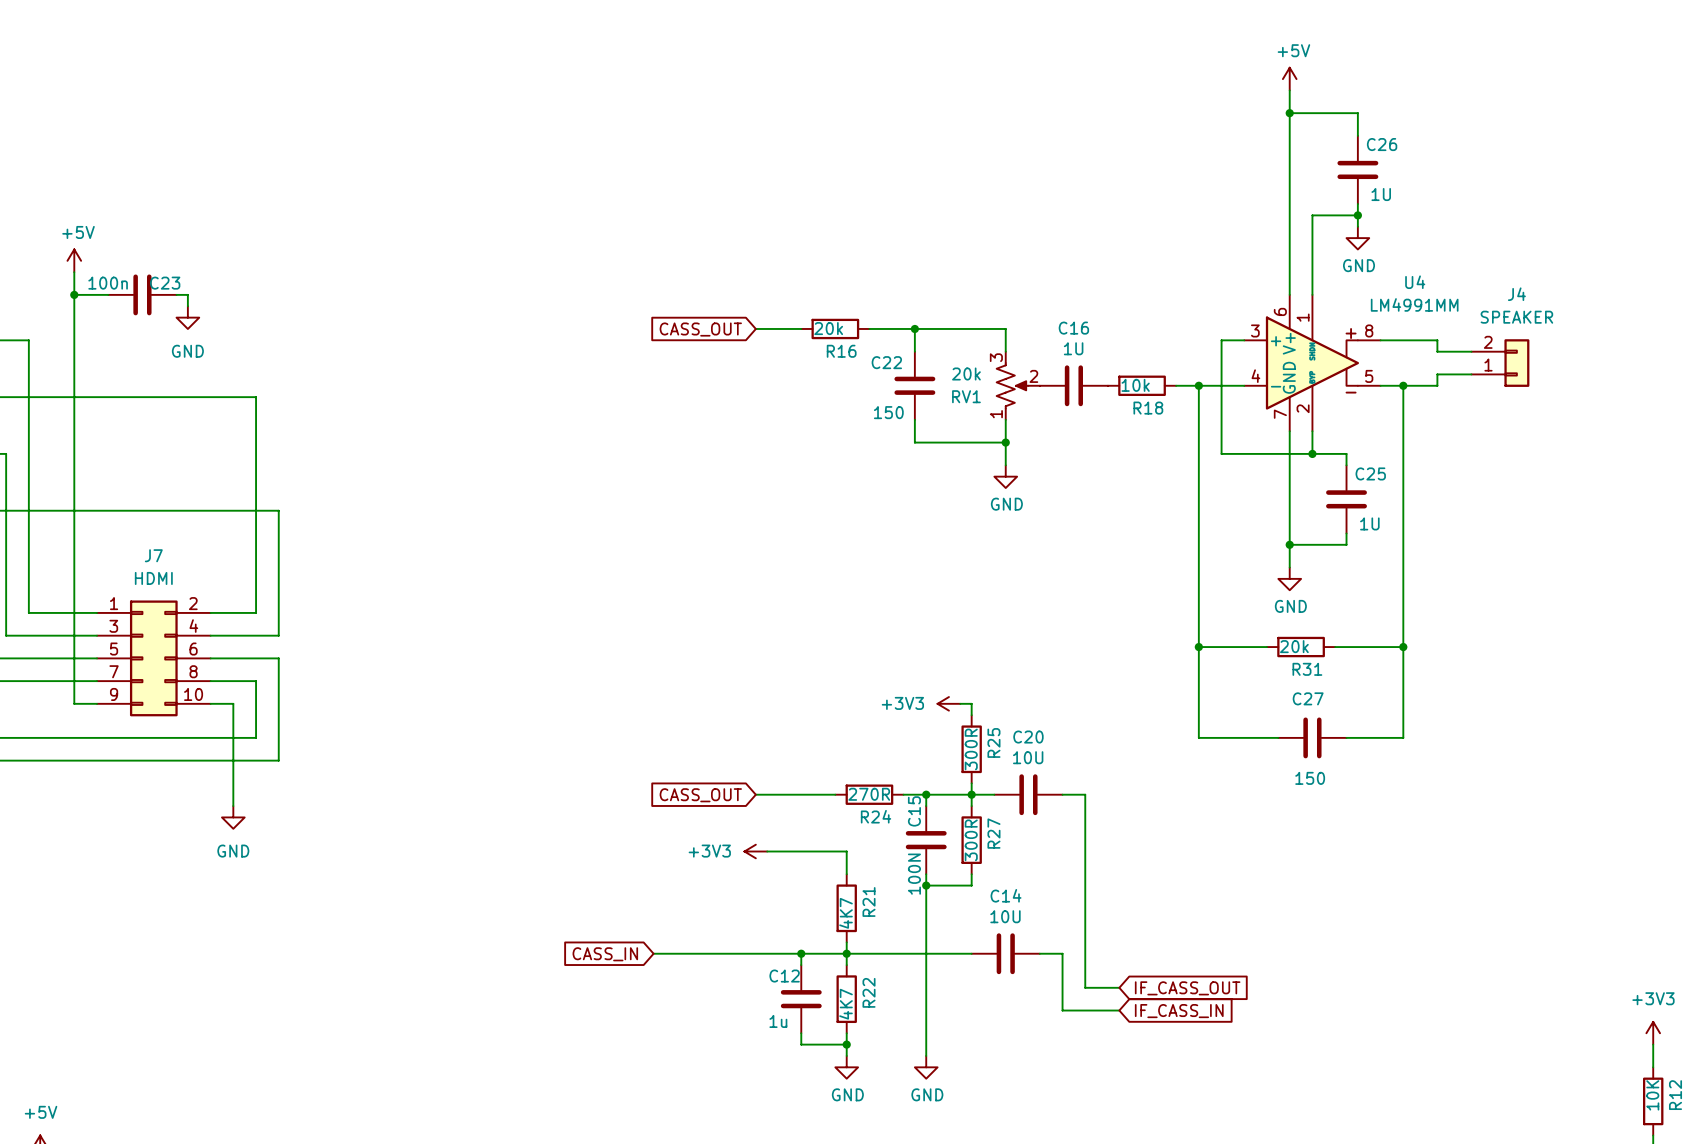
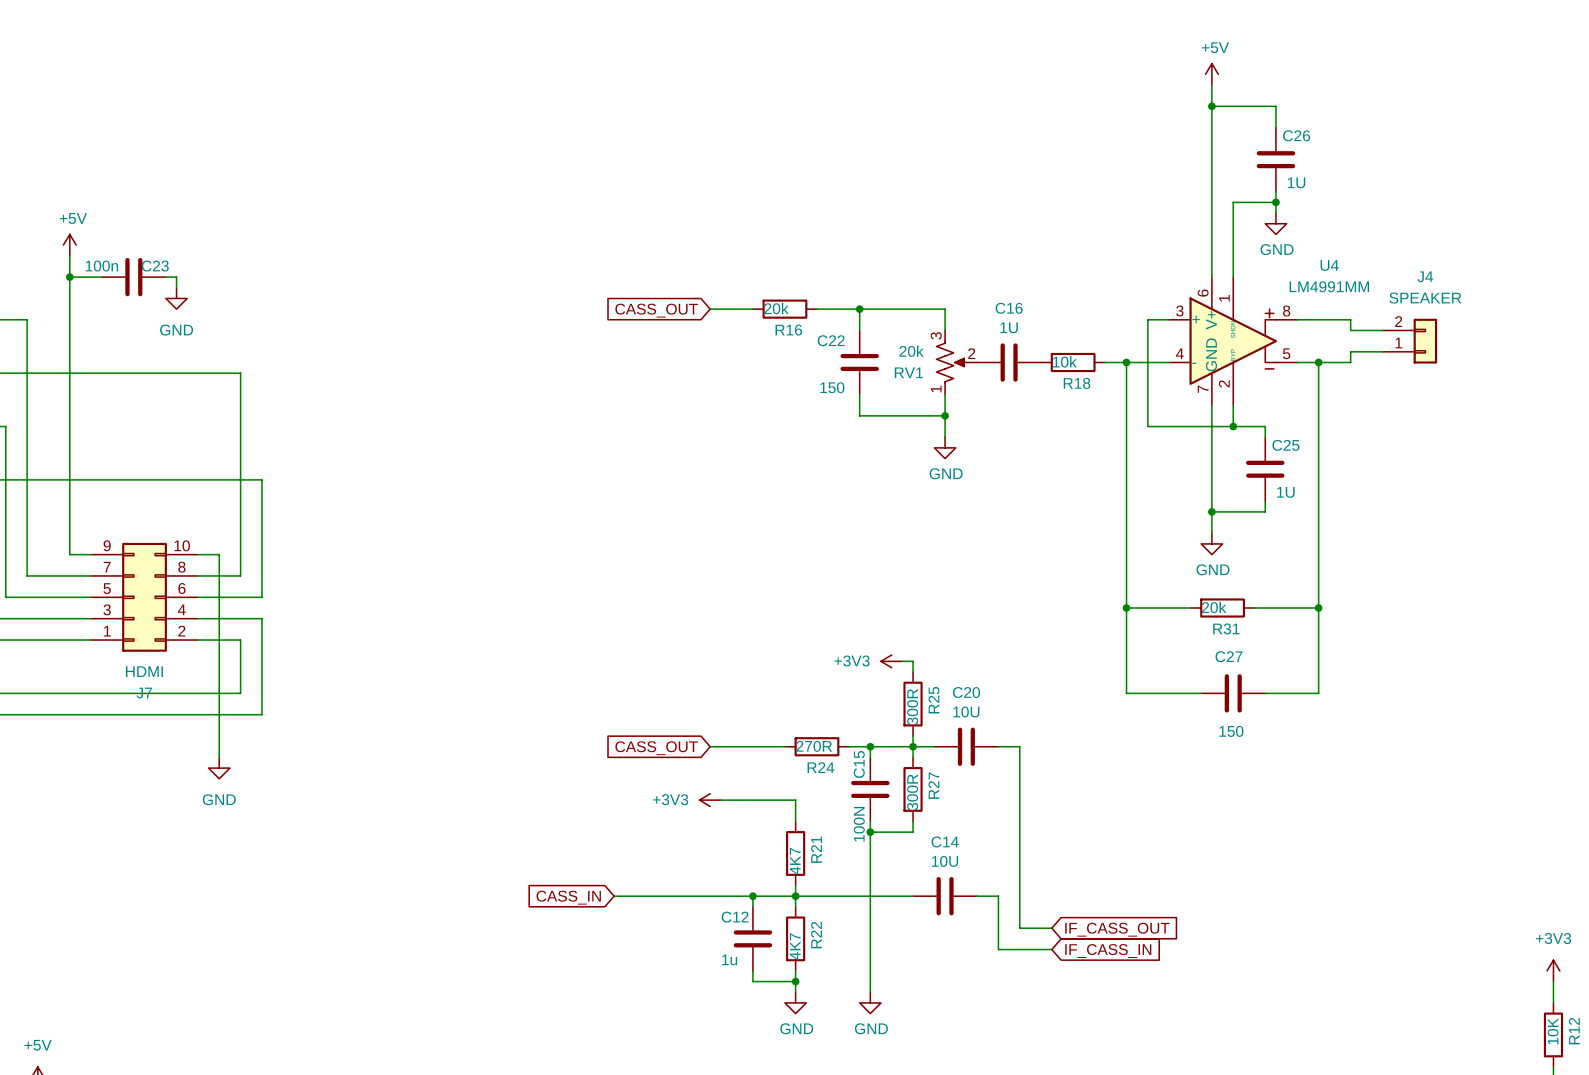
wire: (74, 590) (74, 703) (97, 703) -> (69, 554) (91, 554)
J7 flip: as is (153, 658) -> up-down (144, 597)
wire: (210, 703) (233, 703) -> (197, 554) (219, 554) (219, 661)

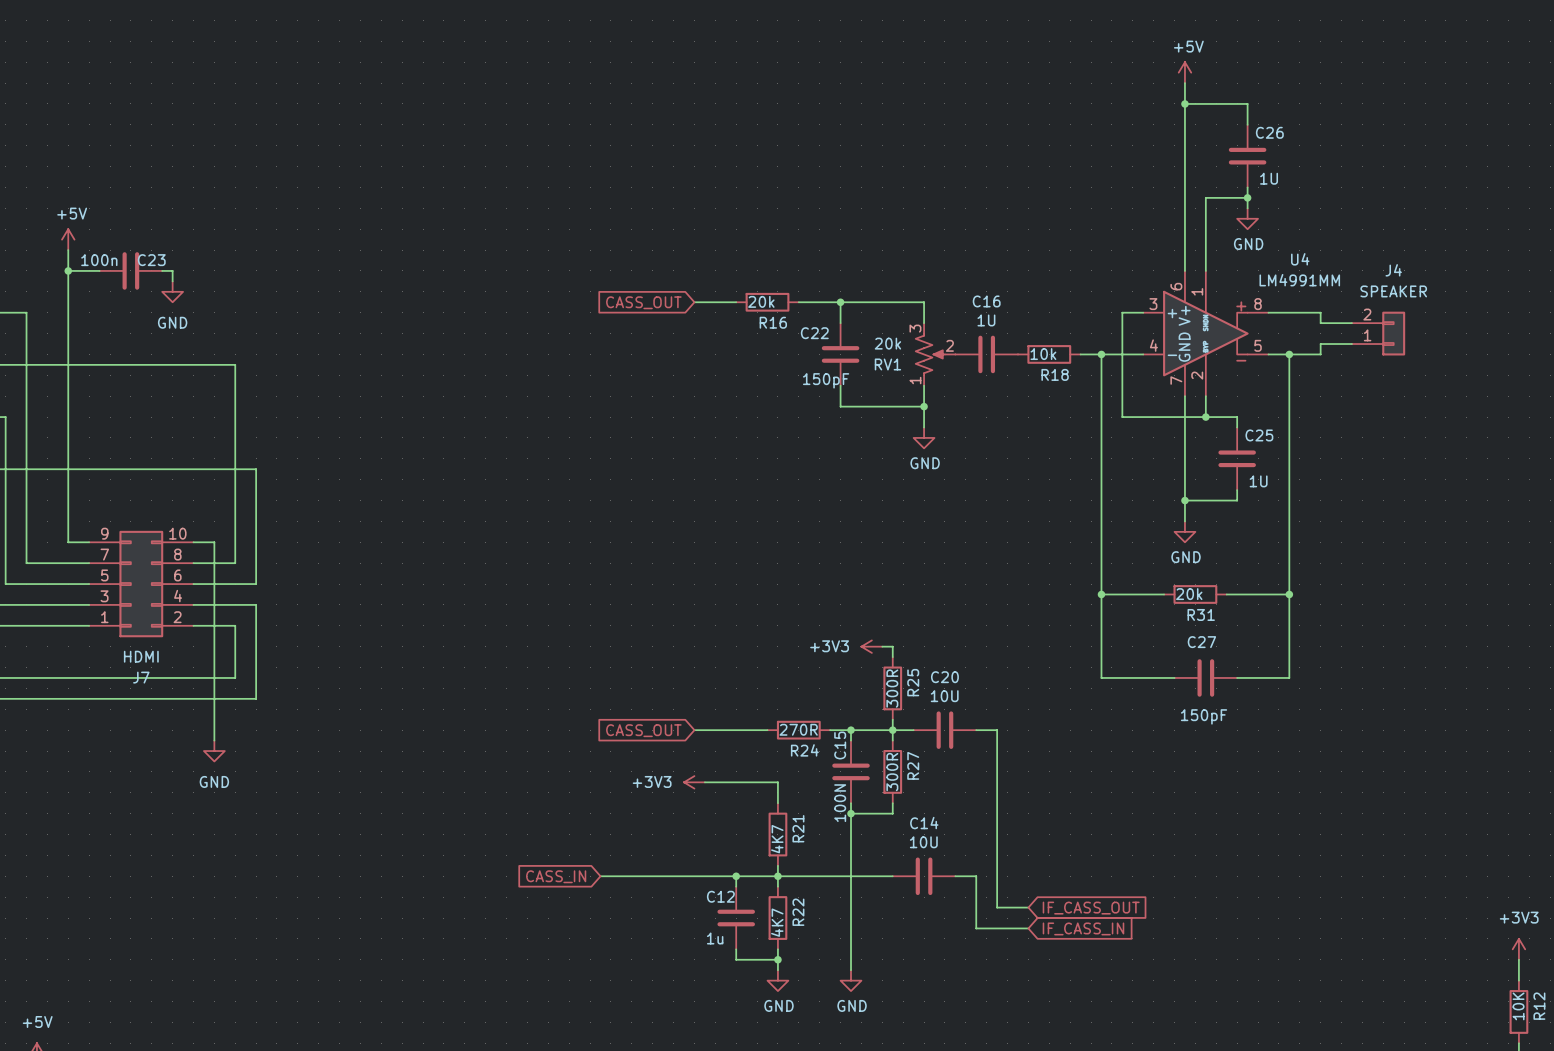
C22 value: 150 (832, 387) -> 150pF (826, 380)
C27 value: 150 (1231, 731) -> 150pF (1204, 716)

